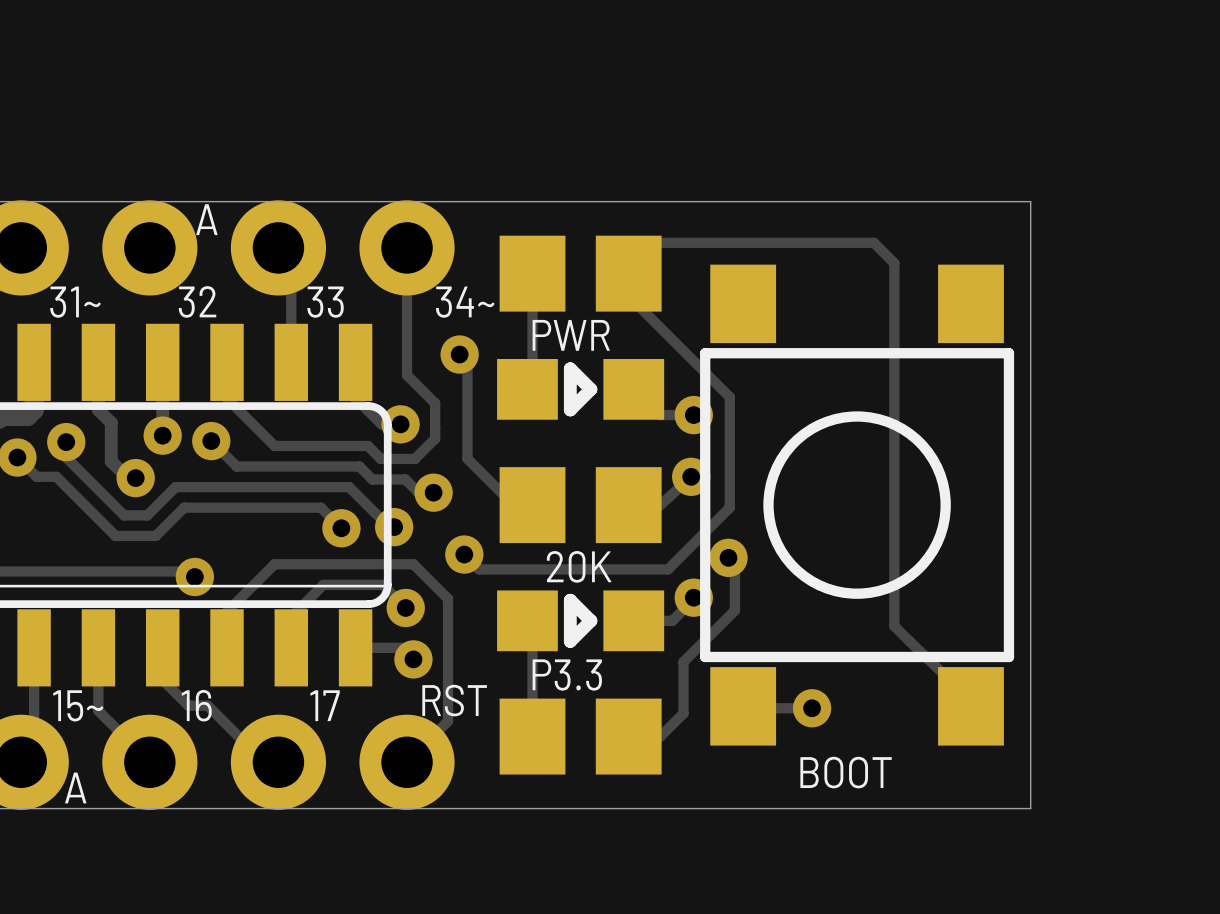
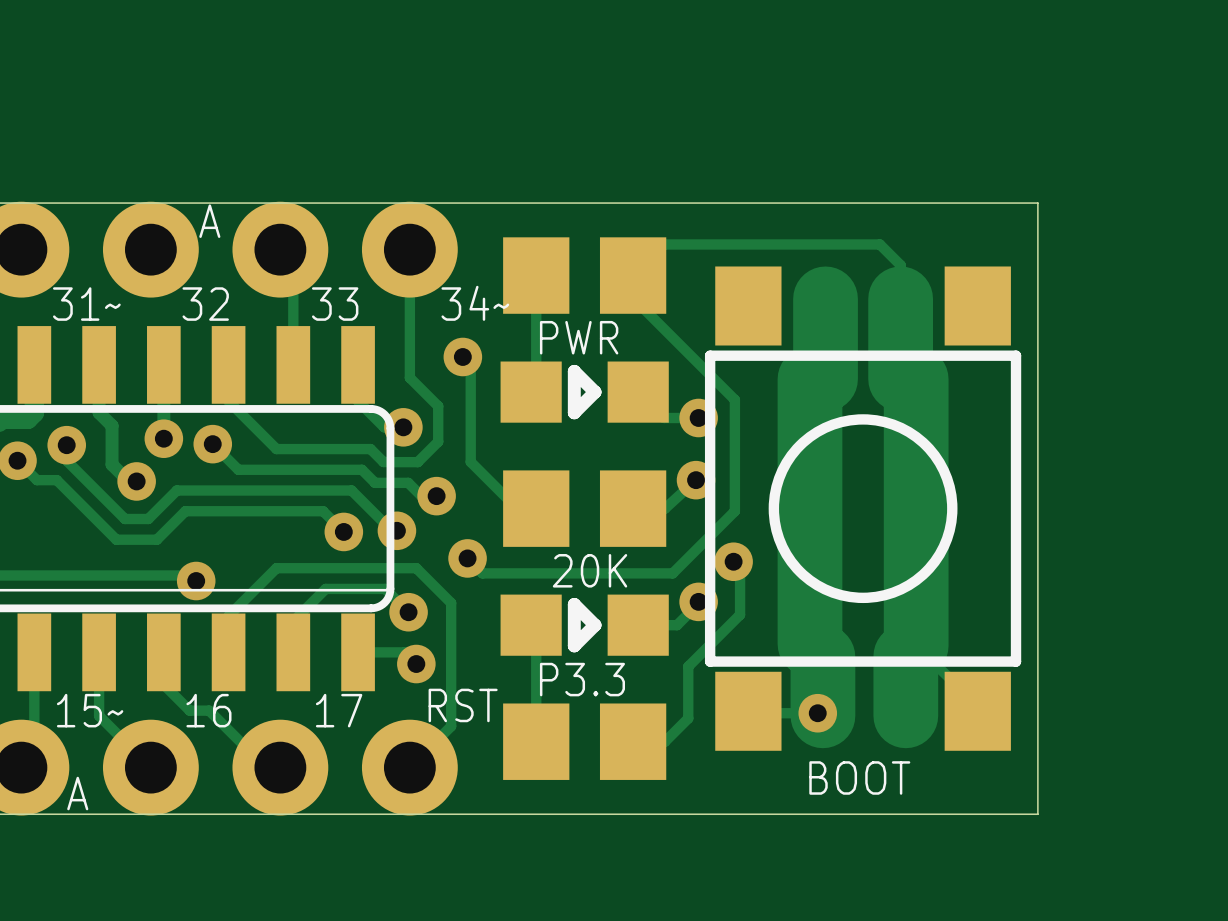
track: none -> (825, 298) (825, 379) (809, 379) (809, 644) (822, 656) (822, 715) (817, 713)
track width: thin (894, 296) (894, 376) -> thick (900, 298) (900, 379)
track: (894, 376) (894, 626) (909, 641) -> (900, 379) (916, 379) (916, 645) (913, 643) (913, 648) (905, 656) (905, 715)

